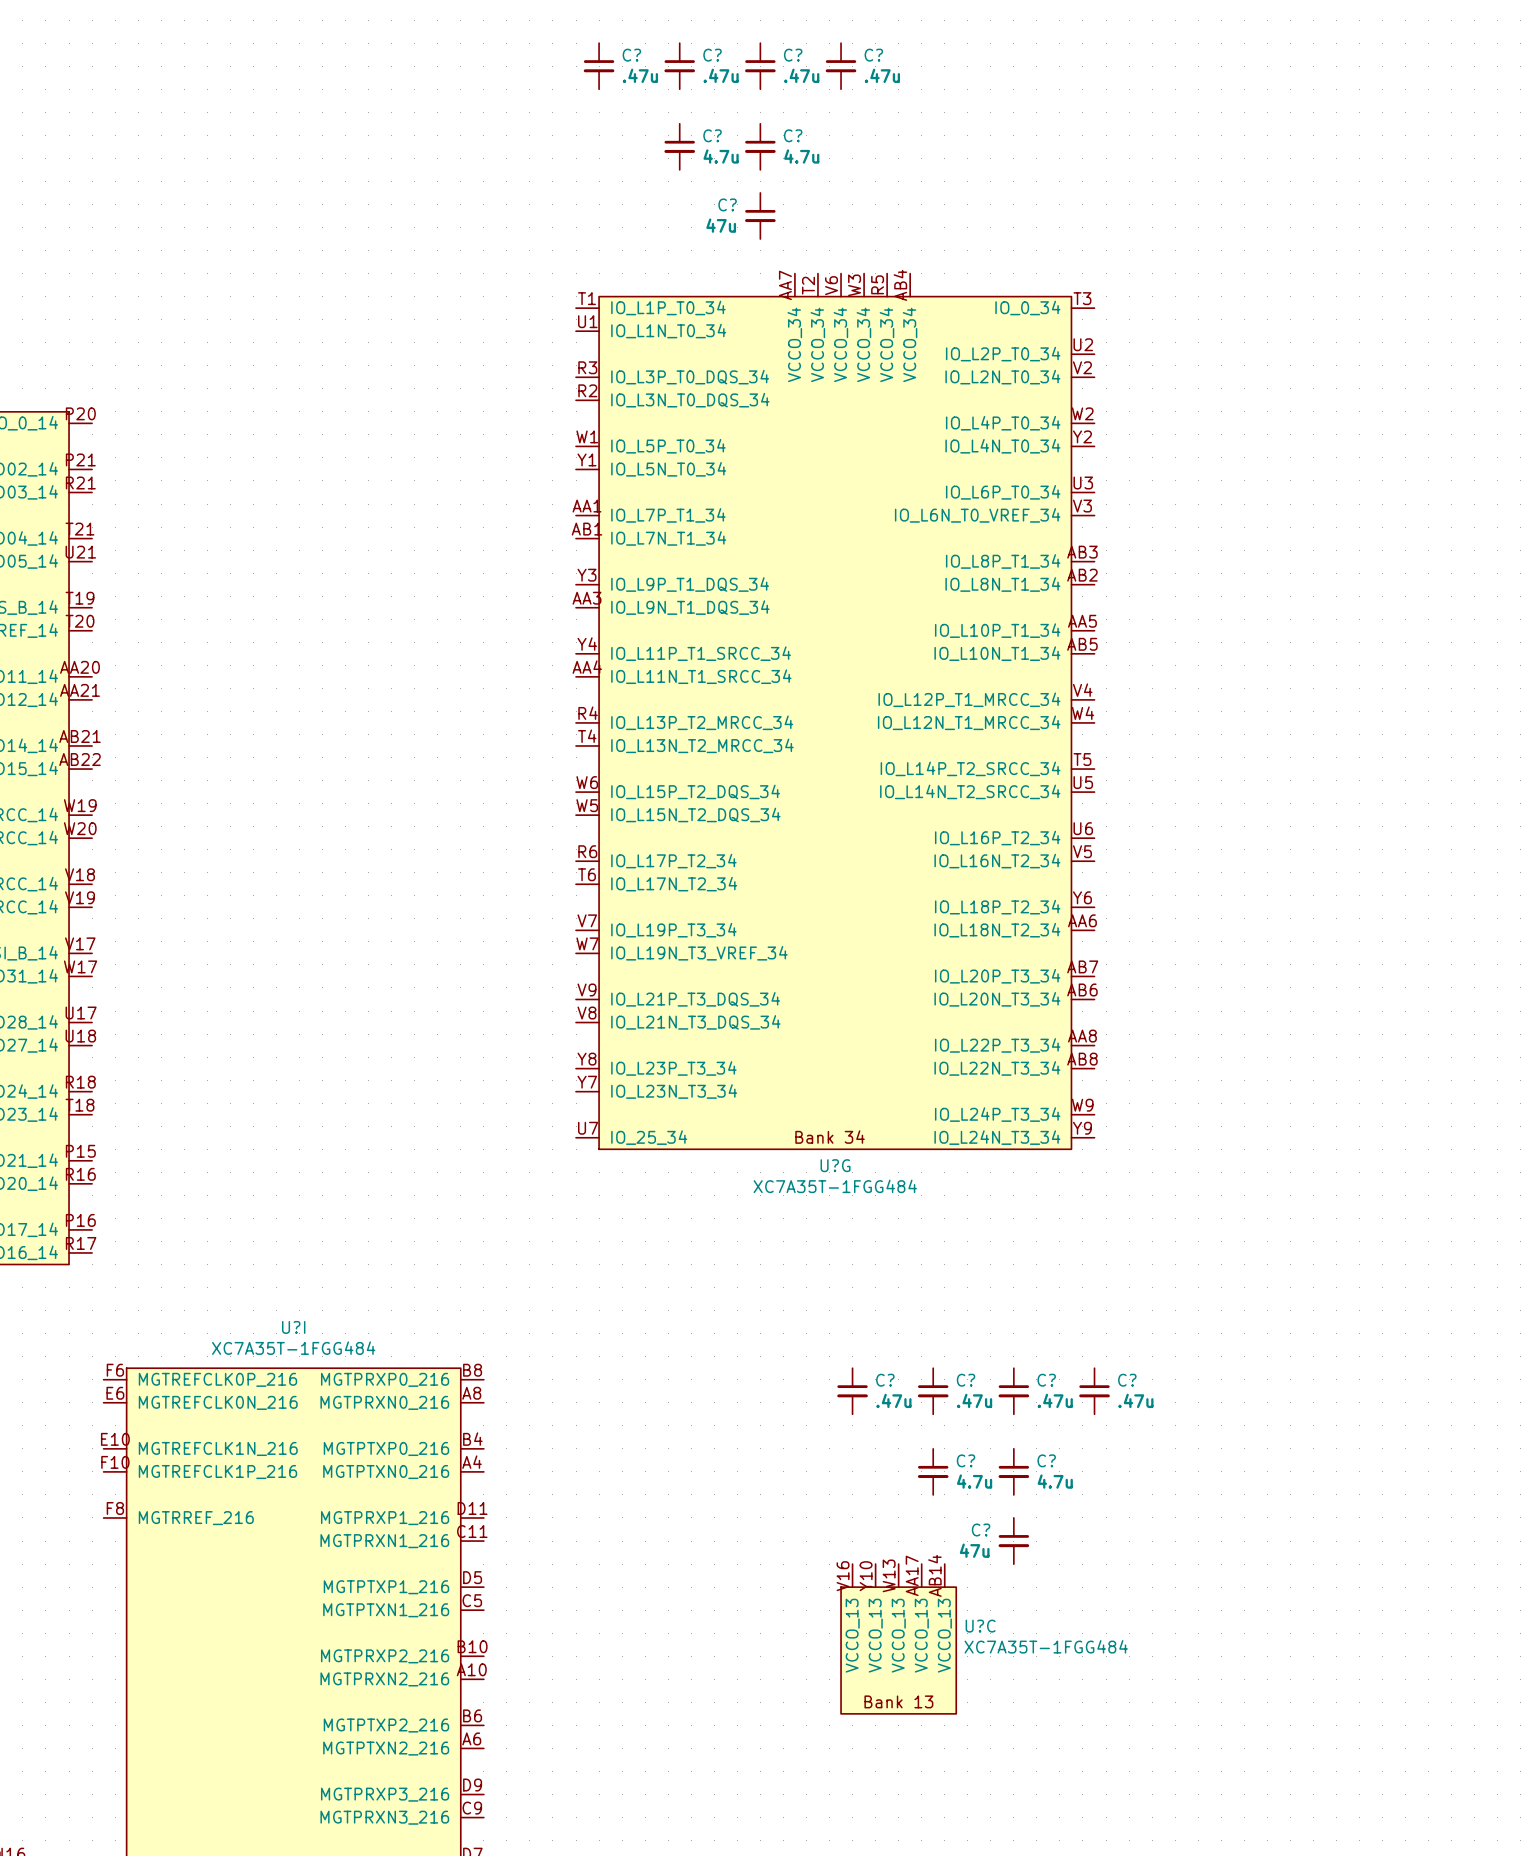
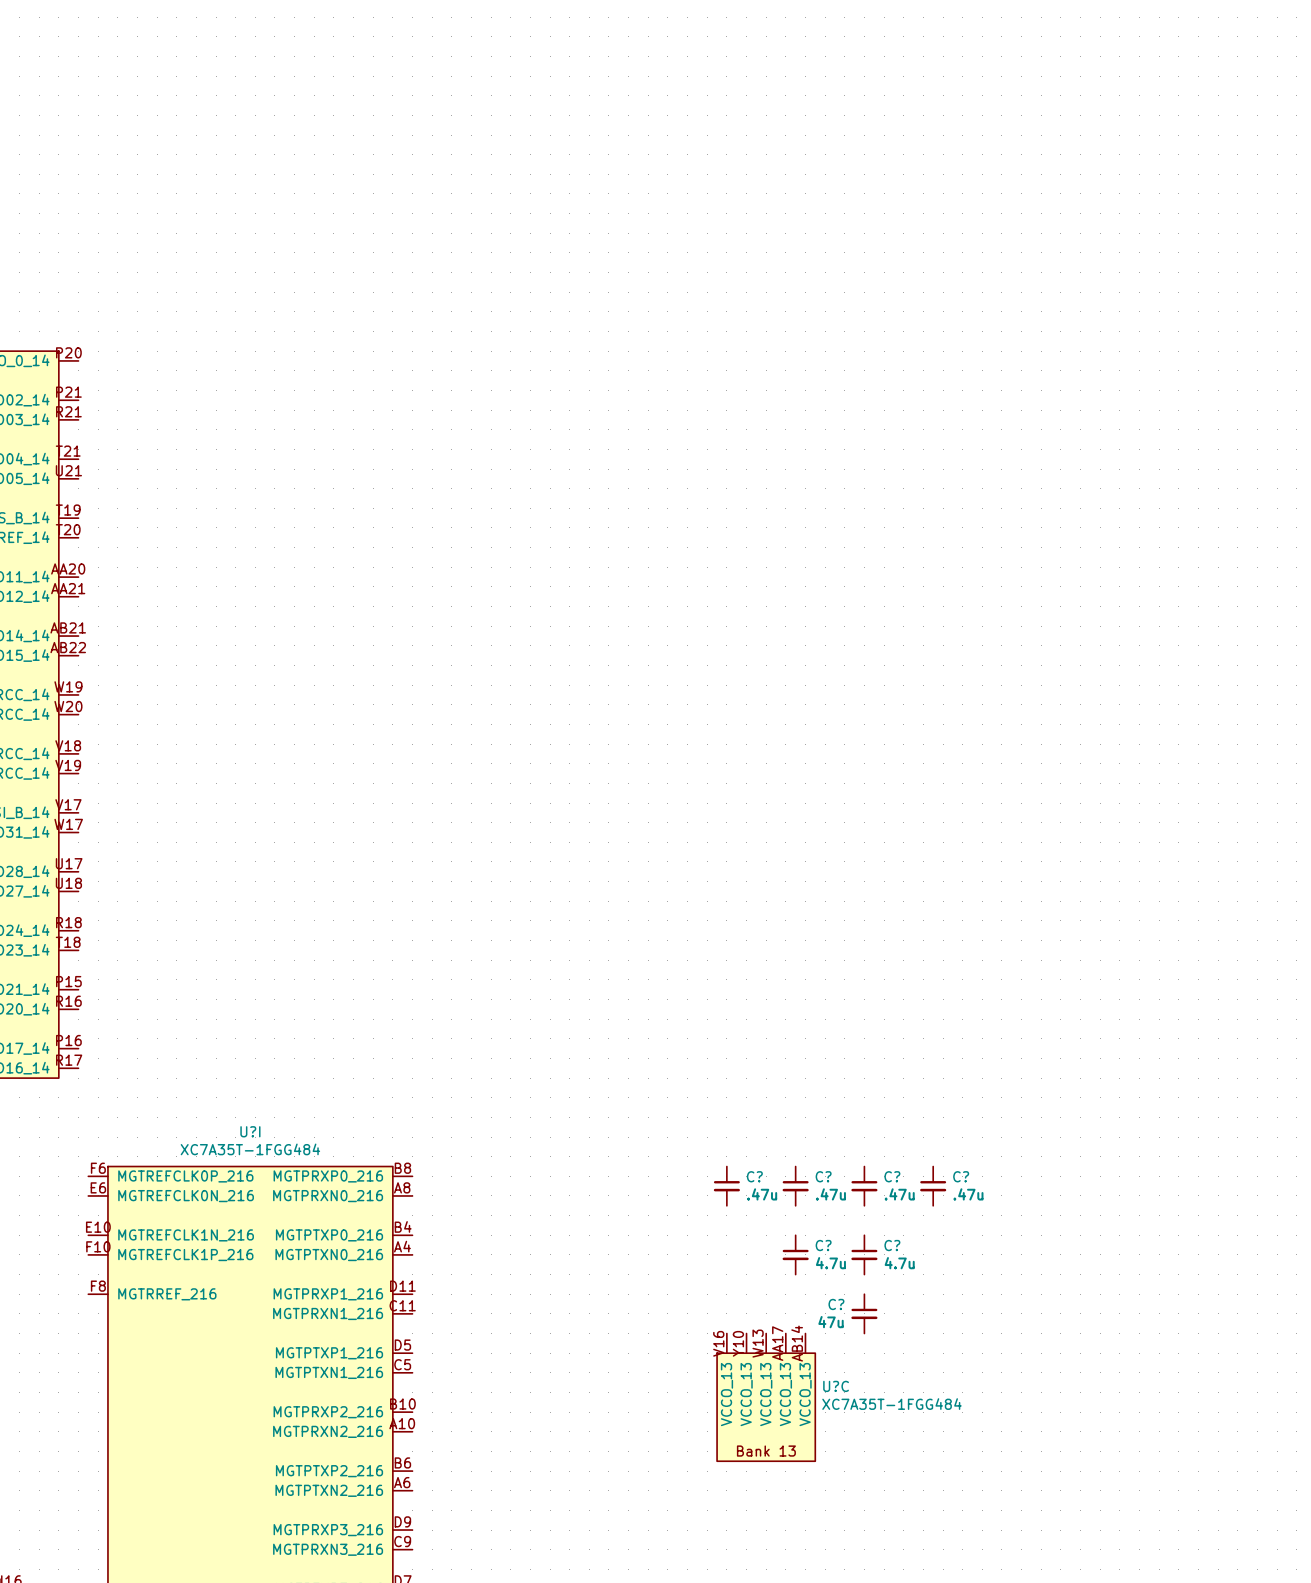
C?: .47u (599, 66) -> none
C?: .47u (679, 66) -> none
C?: .47u (760, 66) -> none
C?: .47u (841, 66) -> none
C?: 4.7u (679, 146) -> none
C?: 4.7u (760, 146) -> none
C?: 47u (760, 215) -> none
U?G: XC7A35T-1FGG484 (835, 711) -> none

